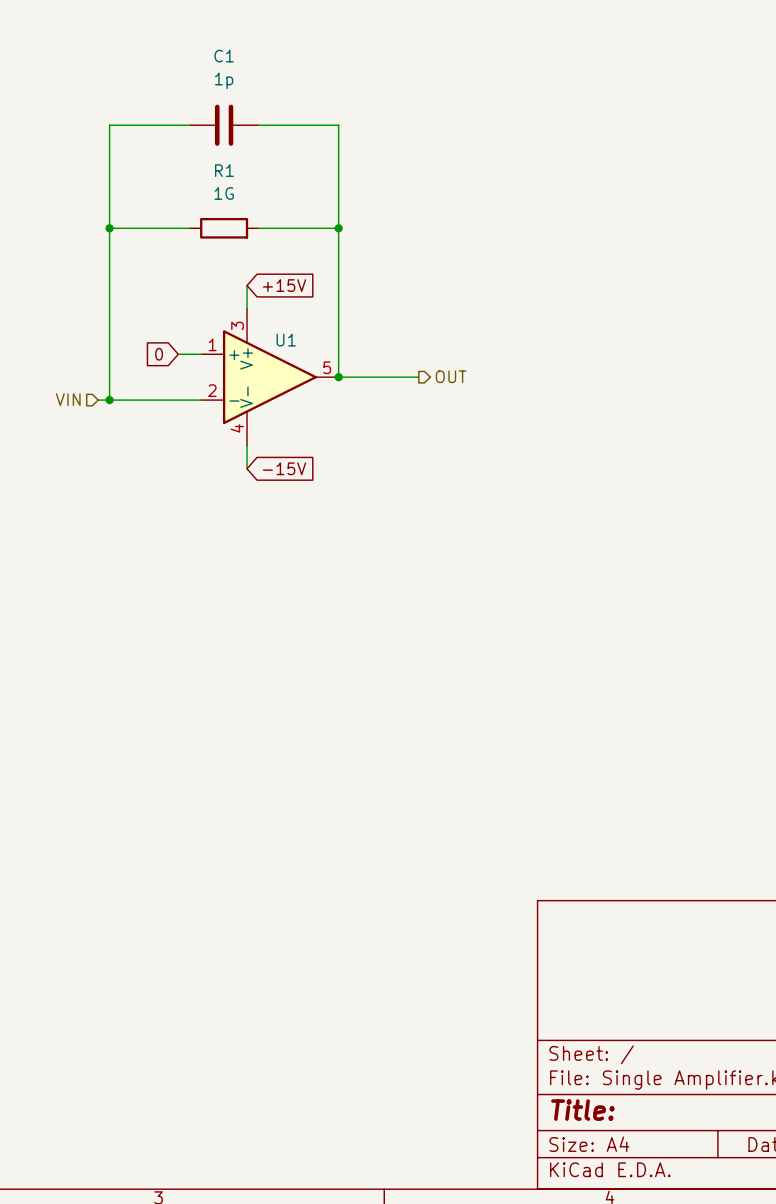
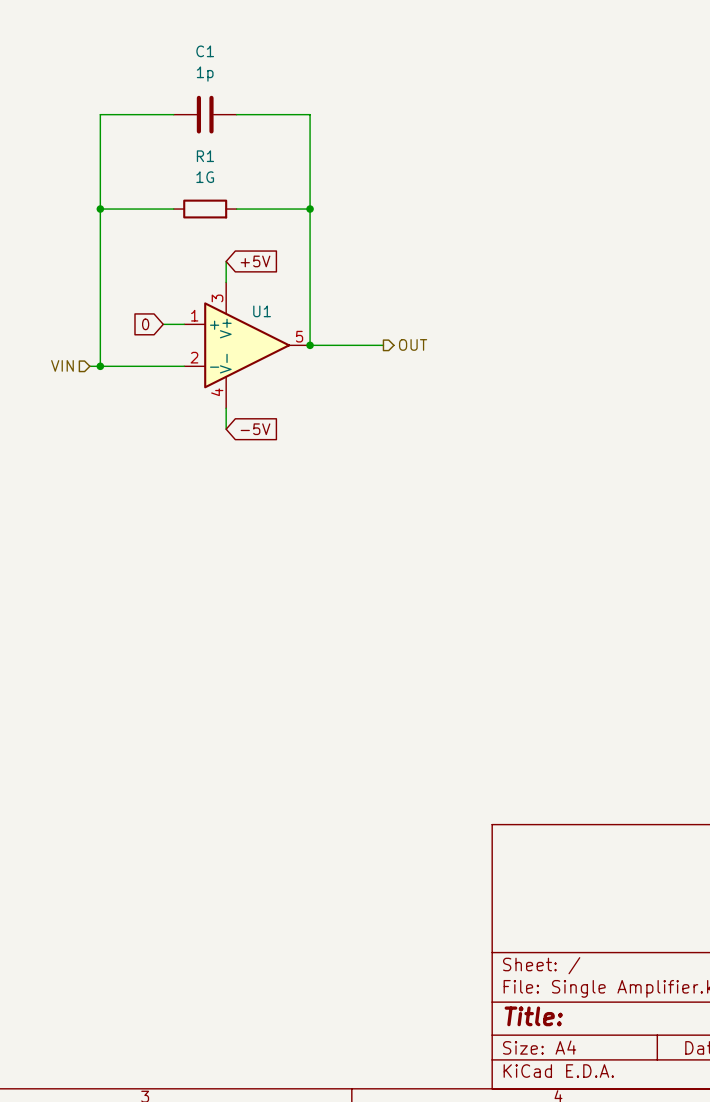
global label: +15V (284, 285) -> +5V (255, 261)
global label: -15V (284, 468) -> -5V (255, 429)

